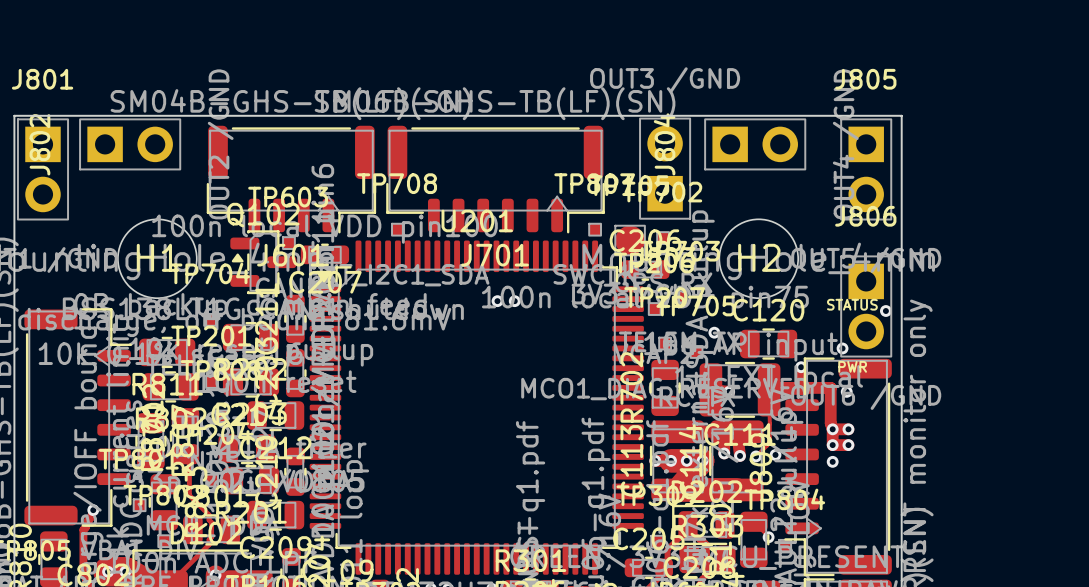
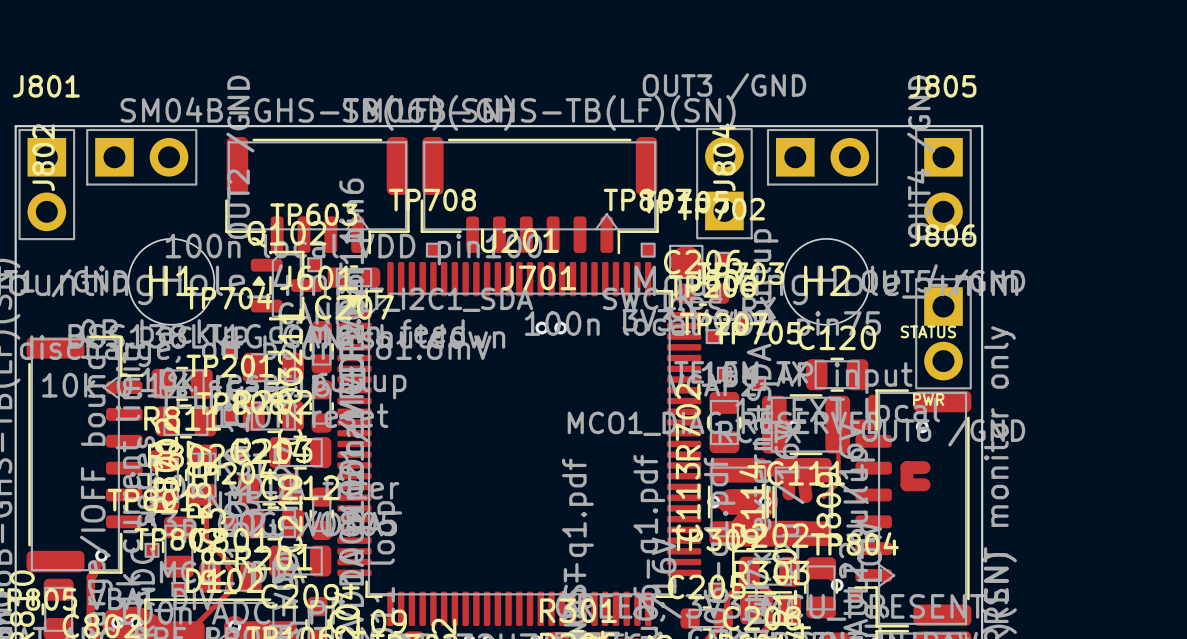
via: (885, 311) -> none
via: (714, 332) -> none
via: (842, 348) -> none
via: (801, 367) -> none
track: (769, 389) (769, 387) (830, 387) (830, 423) (832, 429) -> none
via: (832, 429) -> none
via: (848, 429) -> none
via: (832, 445) -> none
via: (848, 445) -> none
via: (724, 453) -> none
via: (775, 454) -> none
via: (740, 455) -> none
via: (756, 456) -> none
via: (671, 460) -> none
via: (686, 460) -> none
via: (832, 461) -> none

